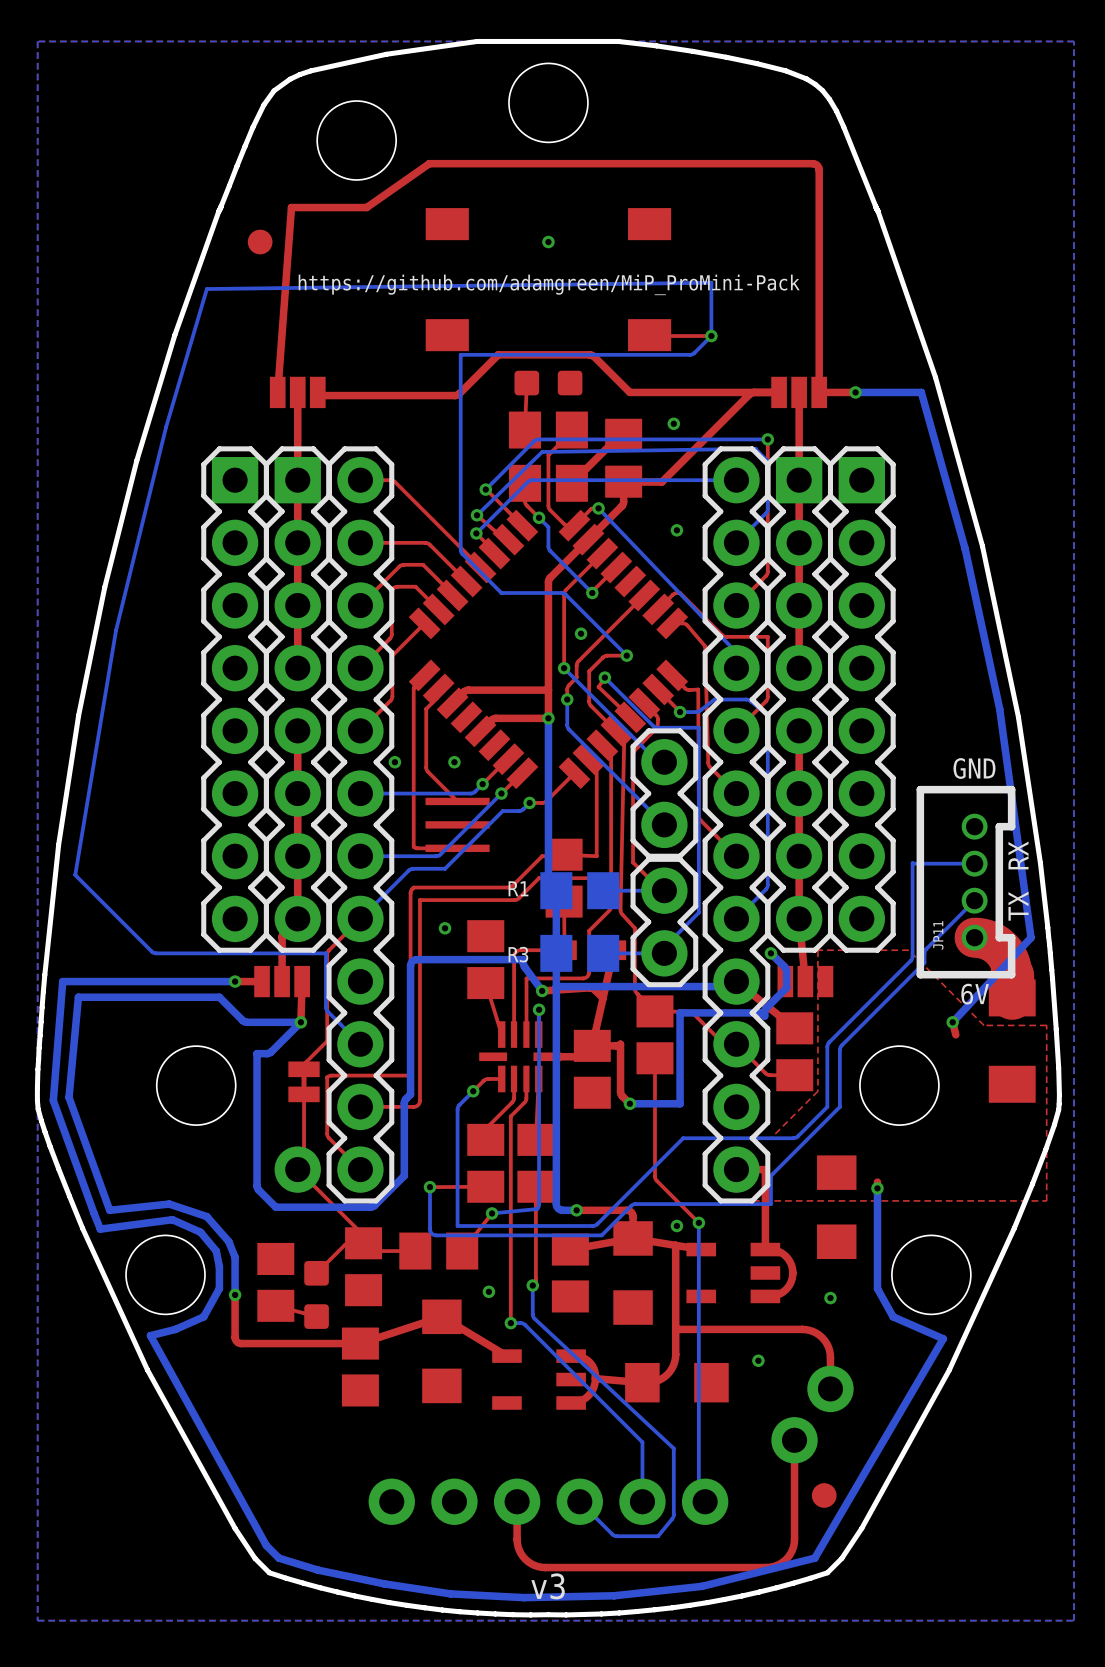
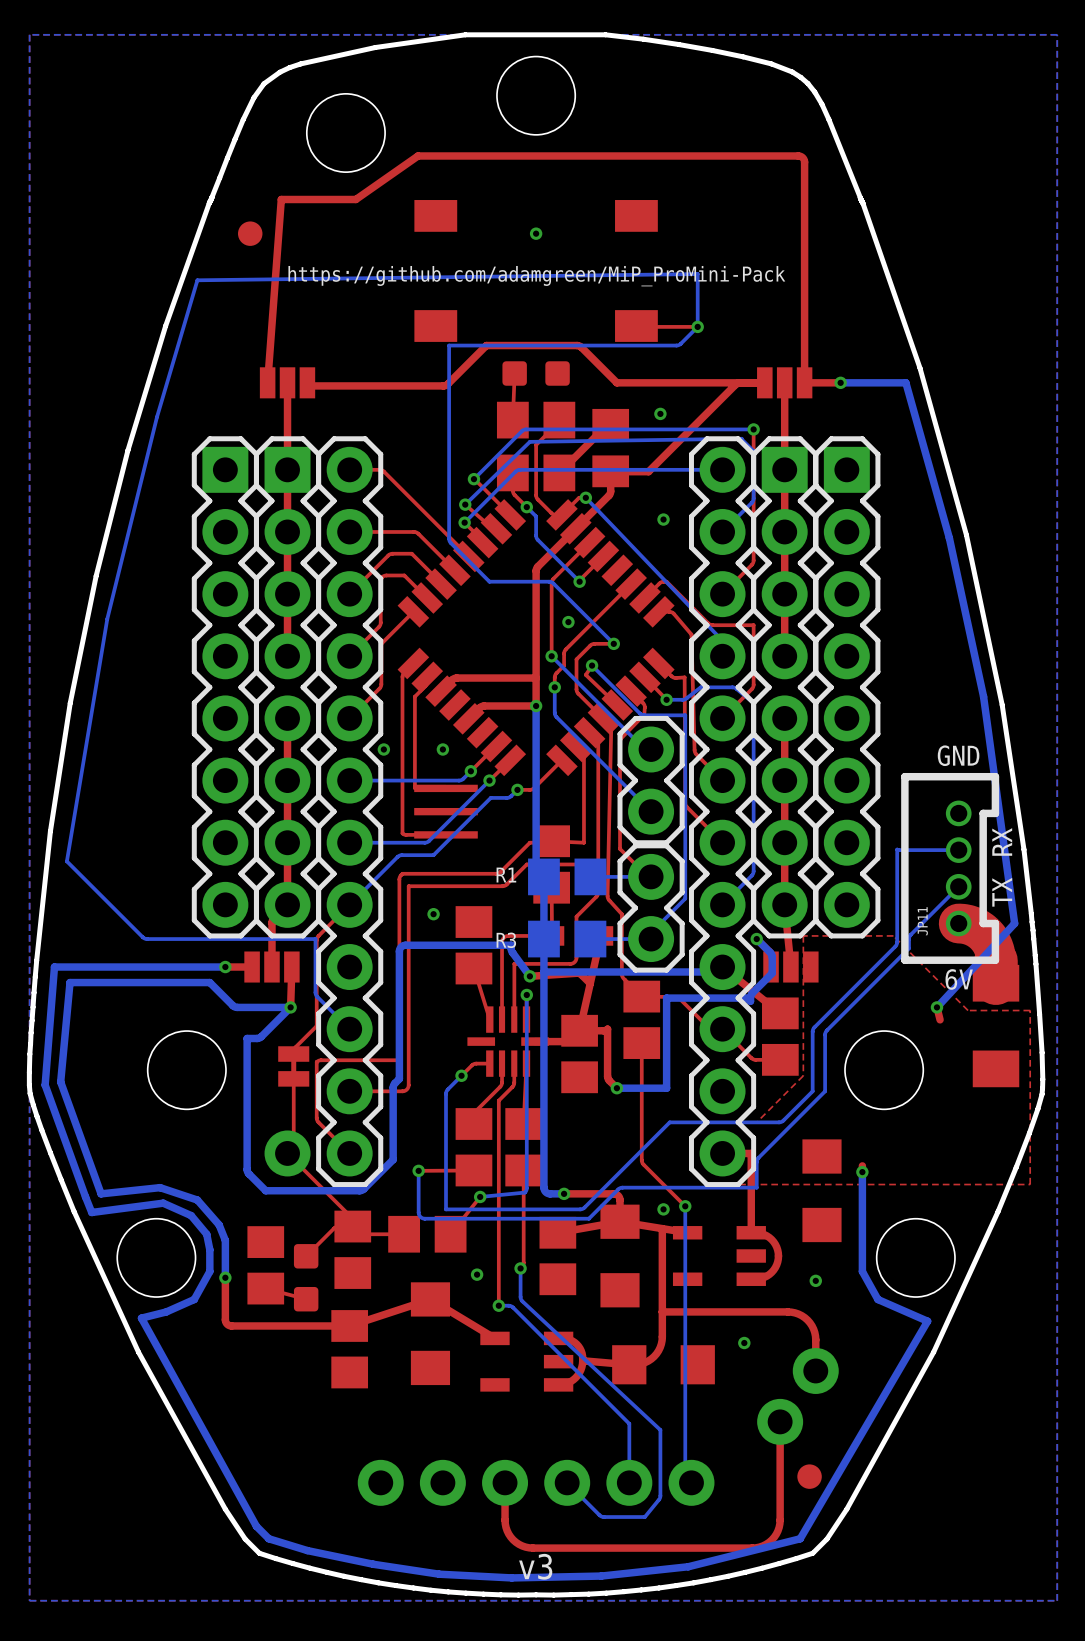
top track: (426, 767) (428, 771) (457, 801) -> (414, 754) (414, 788)

